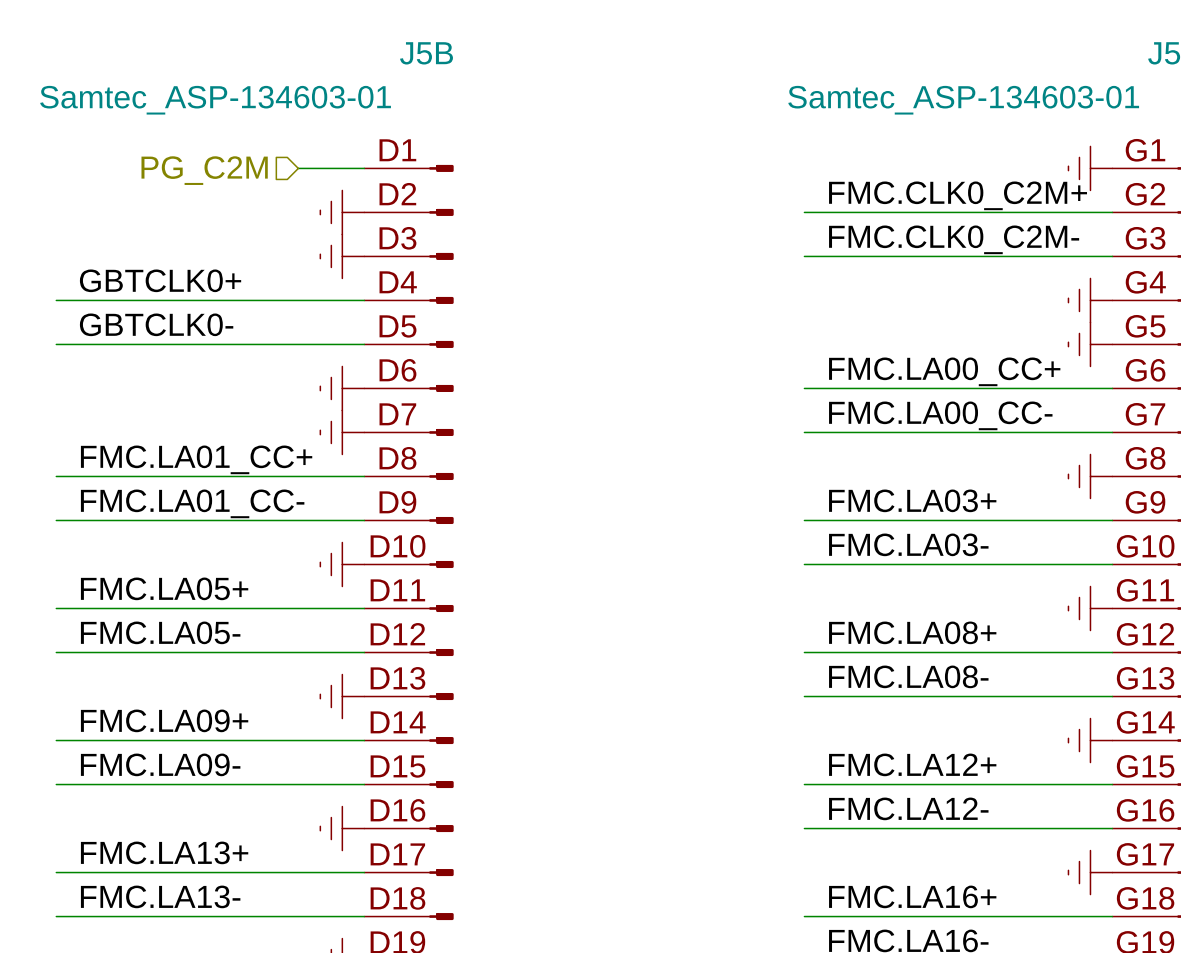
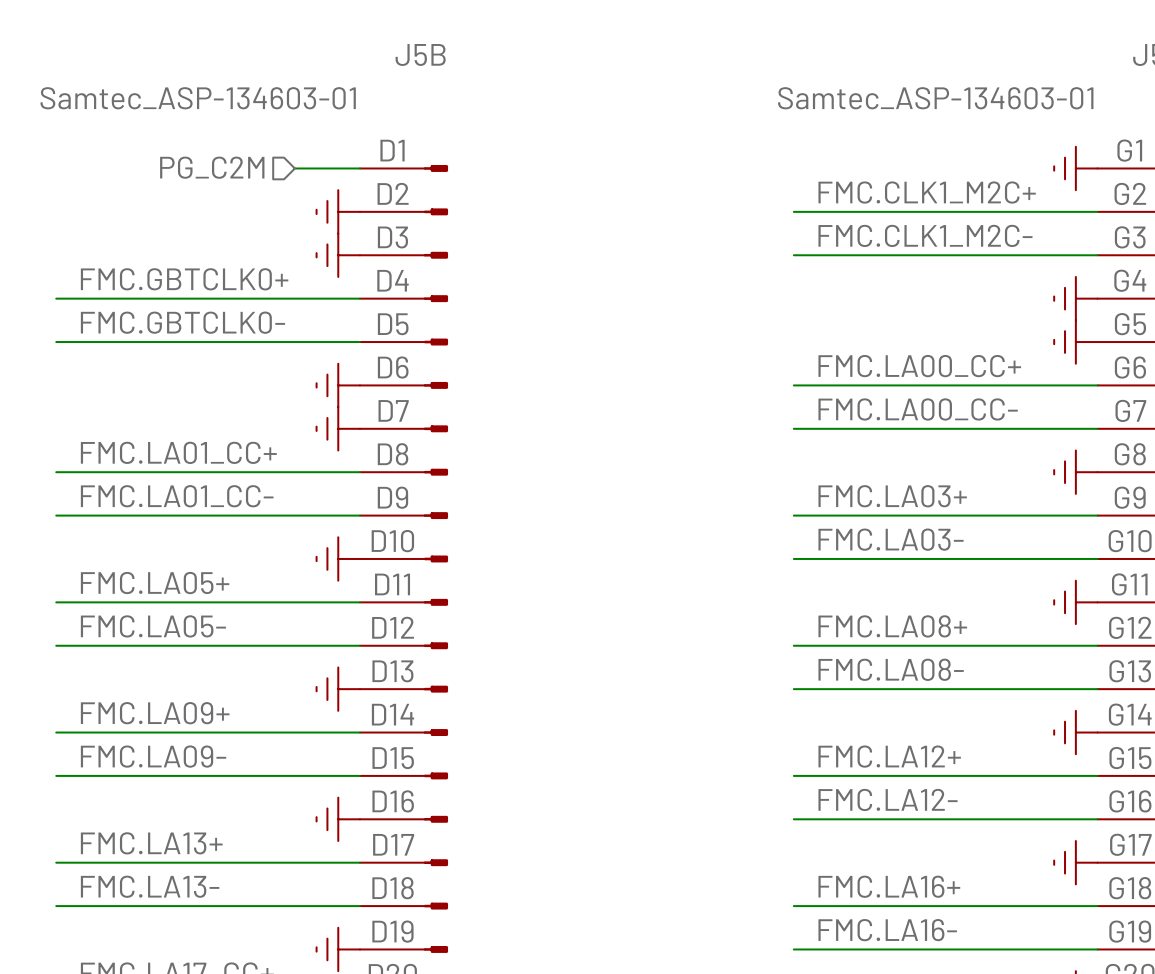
label: FMC.CLK0_C2M+ (958, 195) -> FMC.CLK1_M2C+ (927, 192)
label: FMC.CLK0_C2M- (954, 239) -> FMC.CLK1_M2C- (925, 235)
label: GBTCLK0+ (160, 280) -> FMC.GBTCLK0+ (184, 279)
label: GBTCLK0- (156, 324) -> FMC.GBTCLK0- (182, 322)

